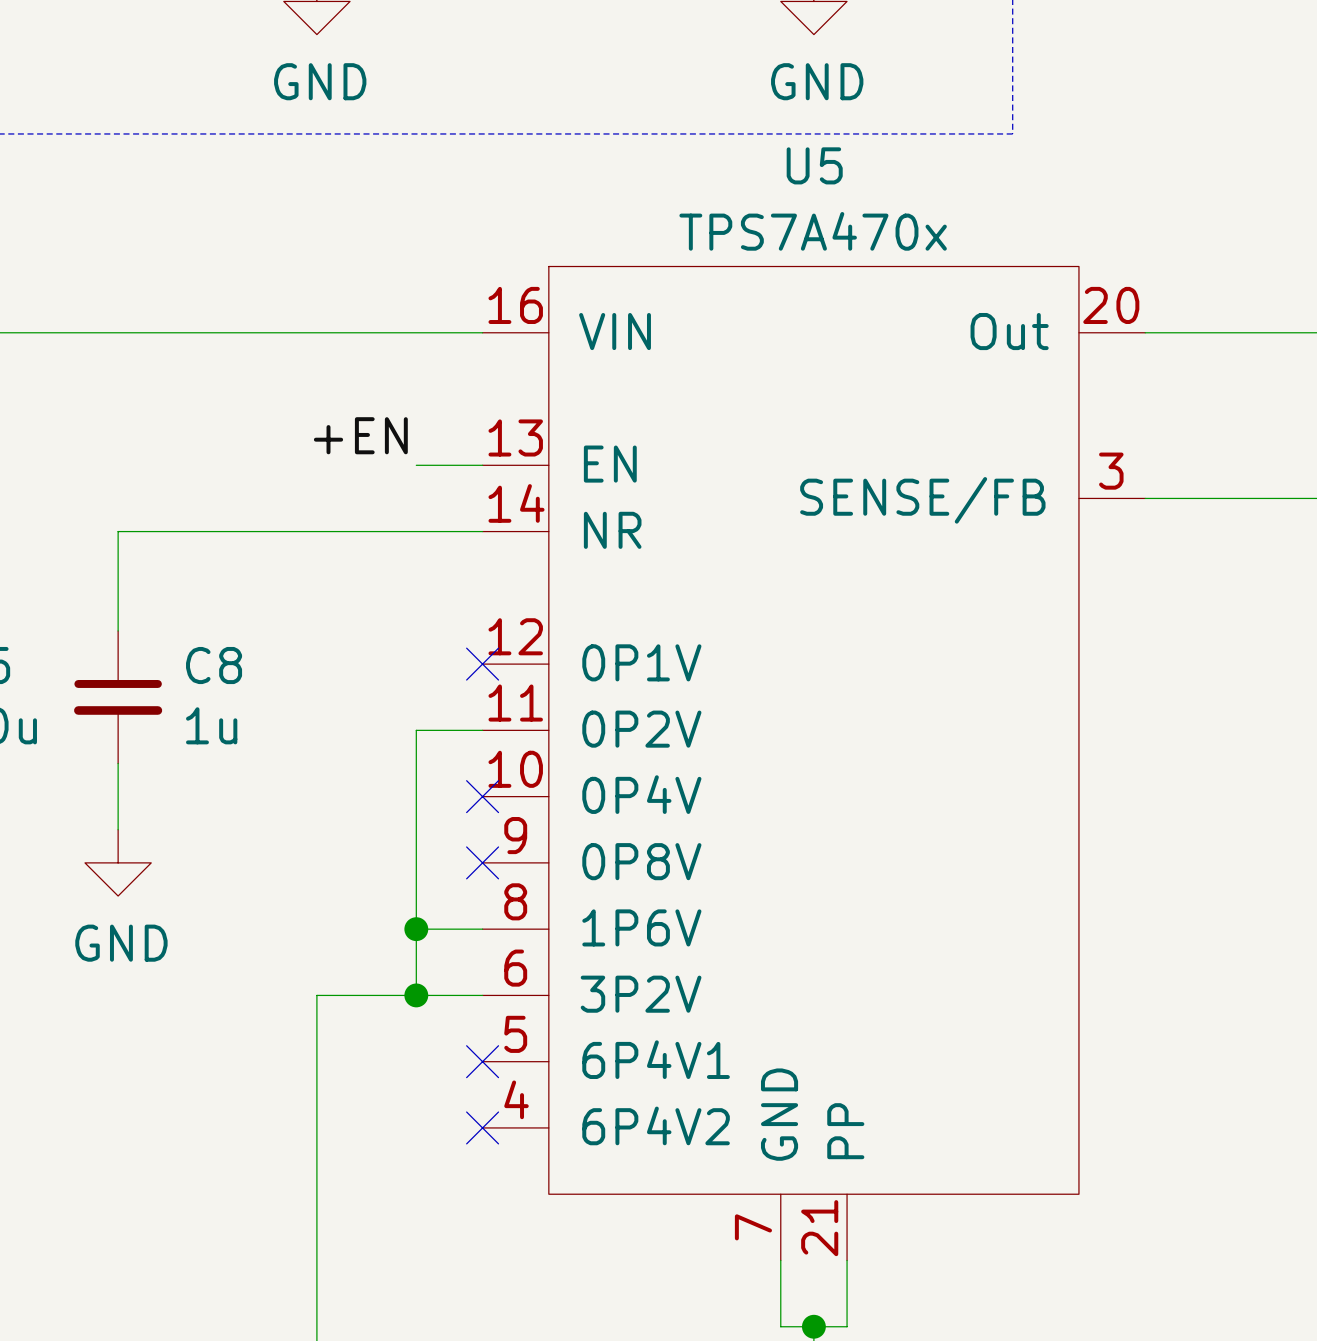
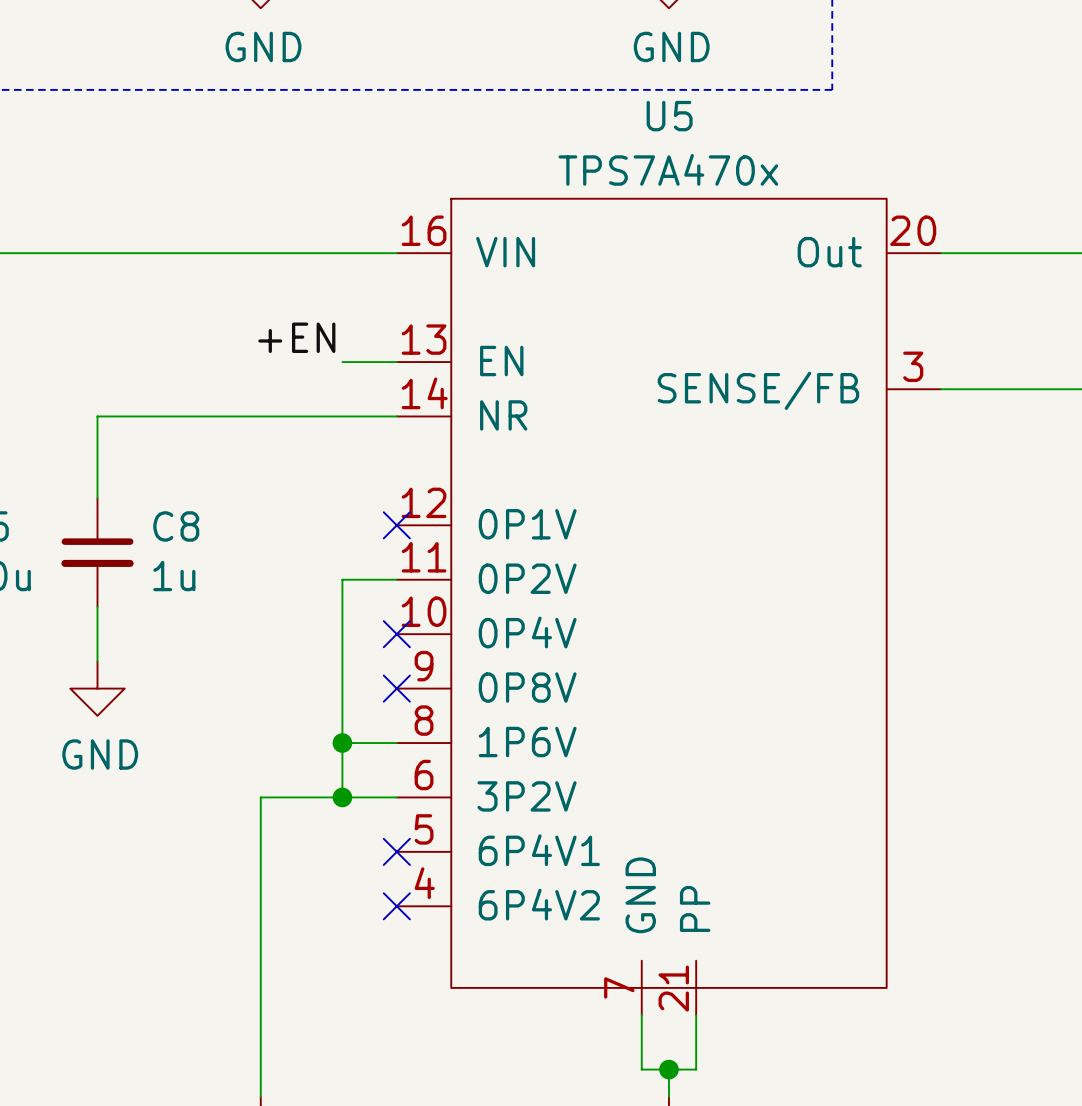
U5 symbol: [482, 266, 1146, 1261] -> [396, 198, 942, 1016]

